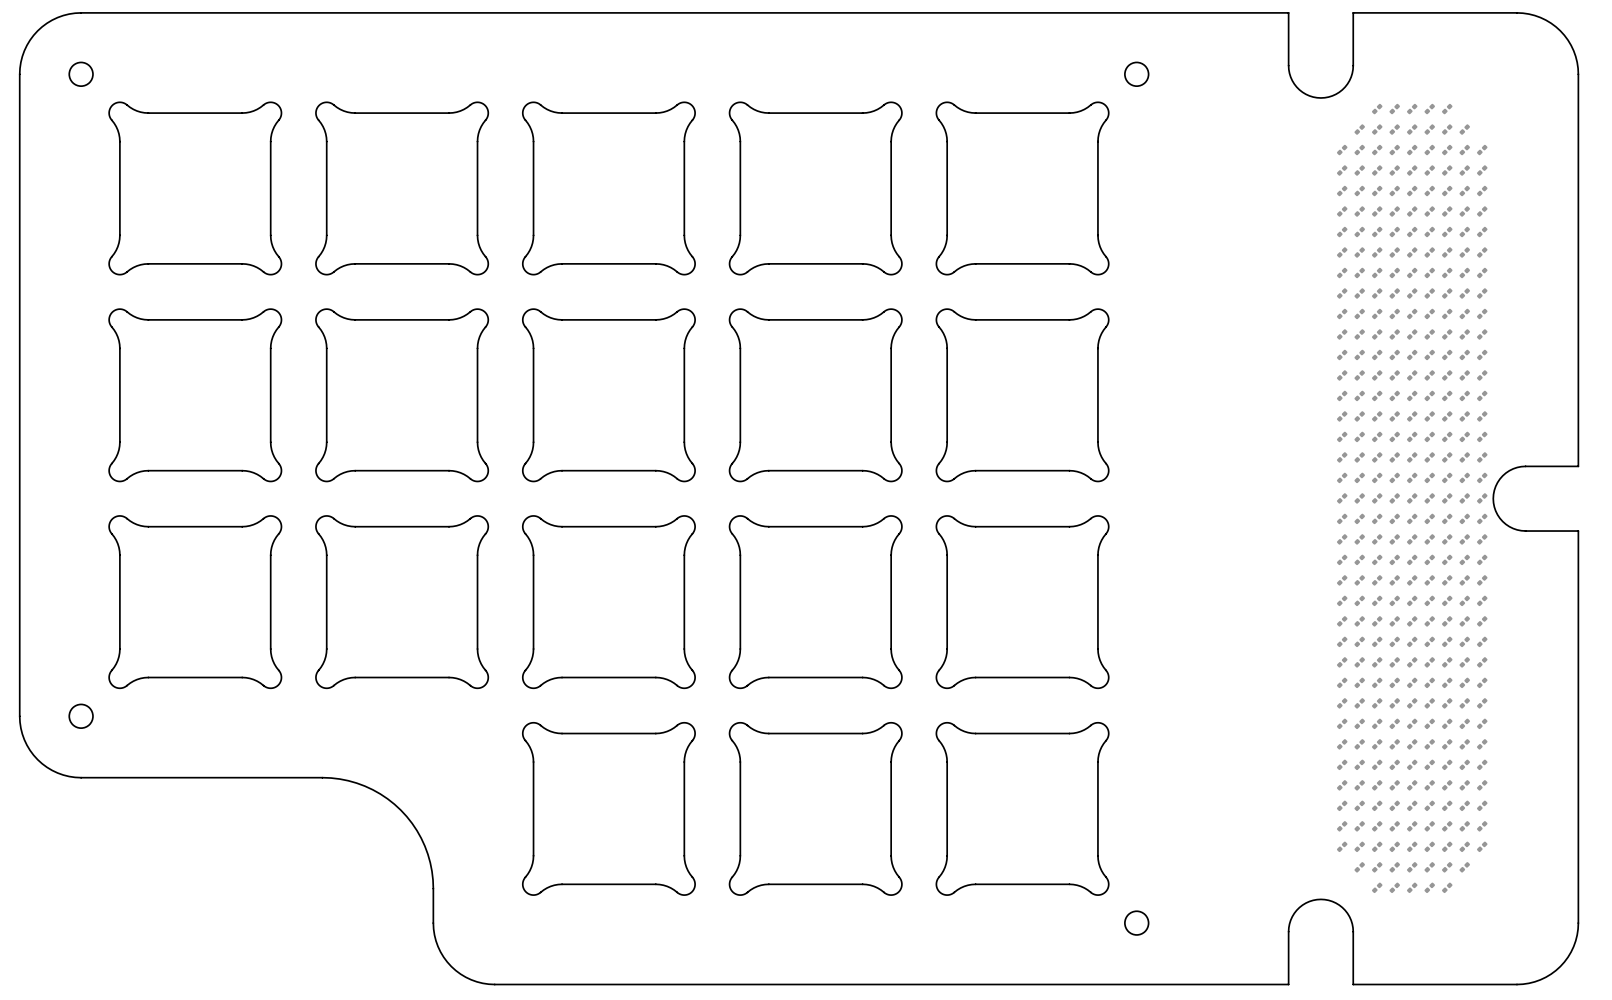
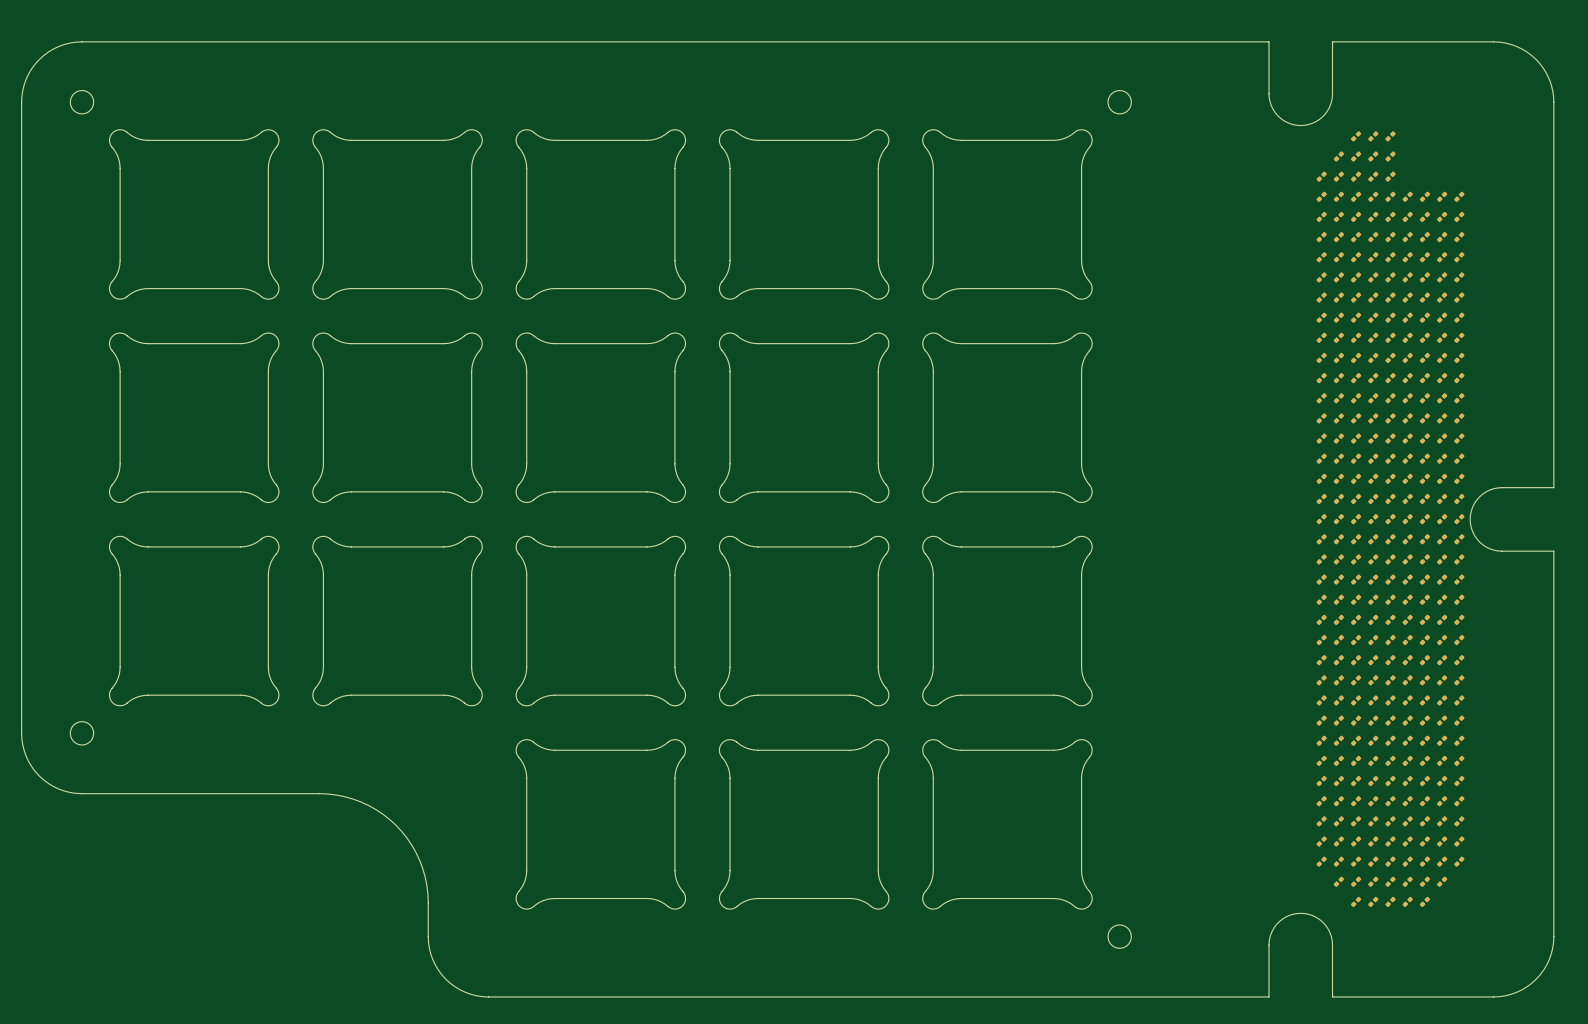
part: (1429, 109) -> none
part: (1447, 109) -> none
part: (1429, 129) -> none
part: (1447, 129) -> none
part: (1464, 129) -> none
part: (1429, 150) -> none
part: (1447, 150) -> none
part: (1464, 150) -> none
part: (1482, 150) -> none

